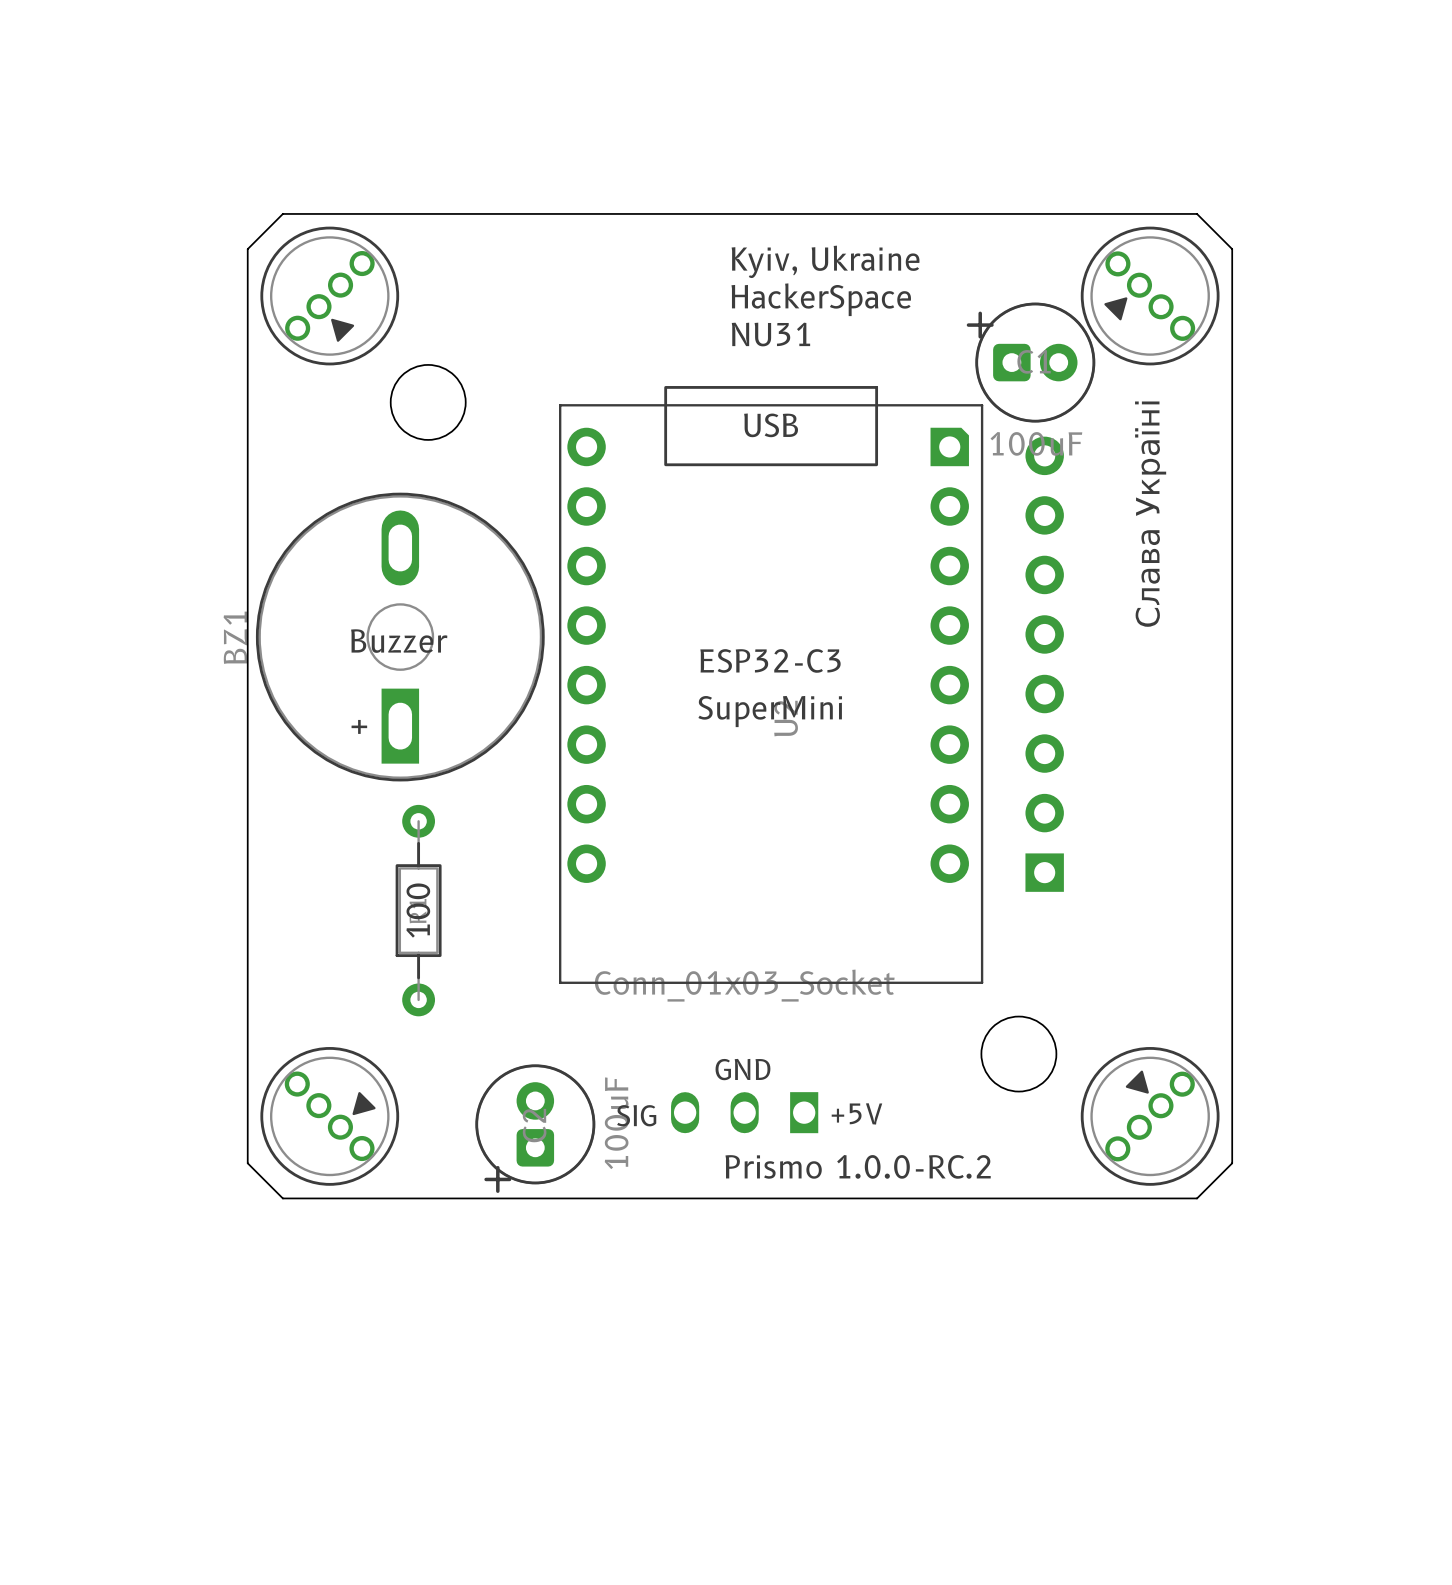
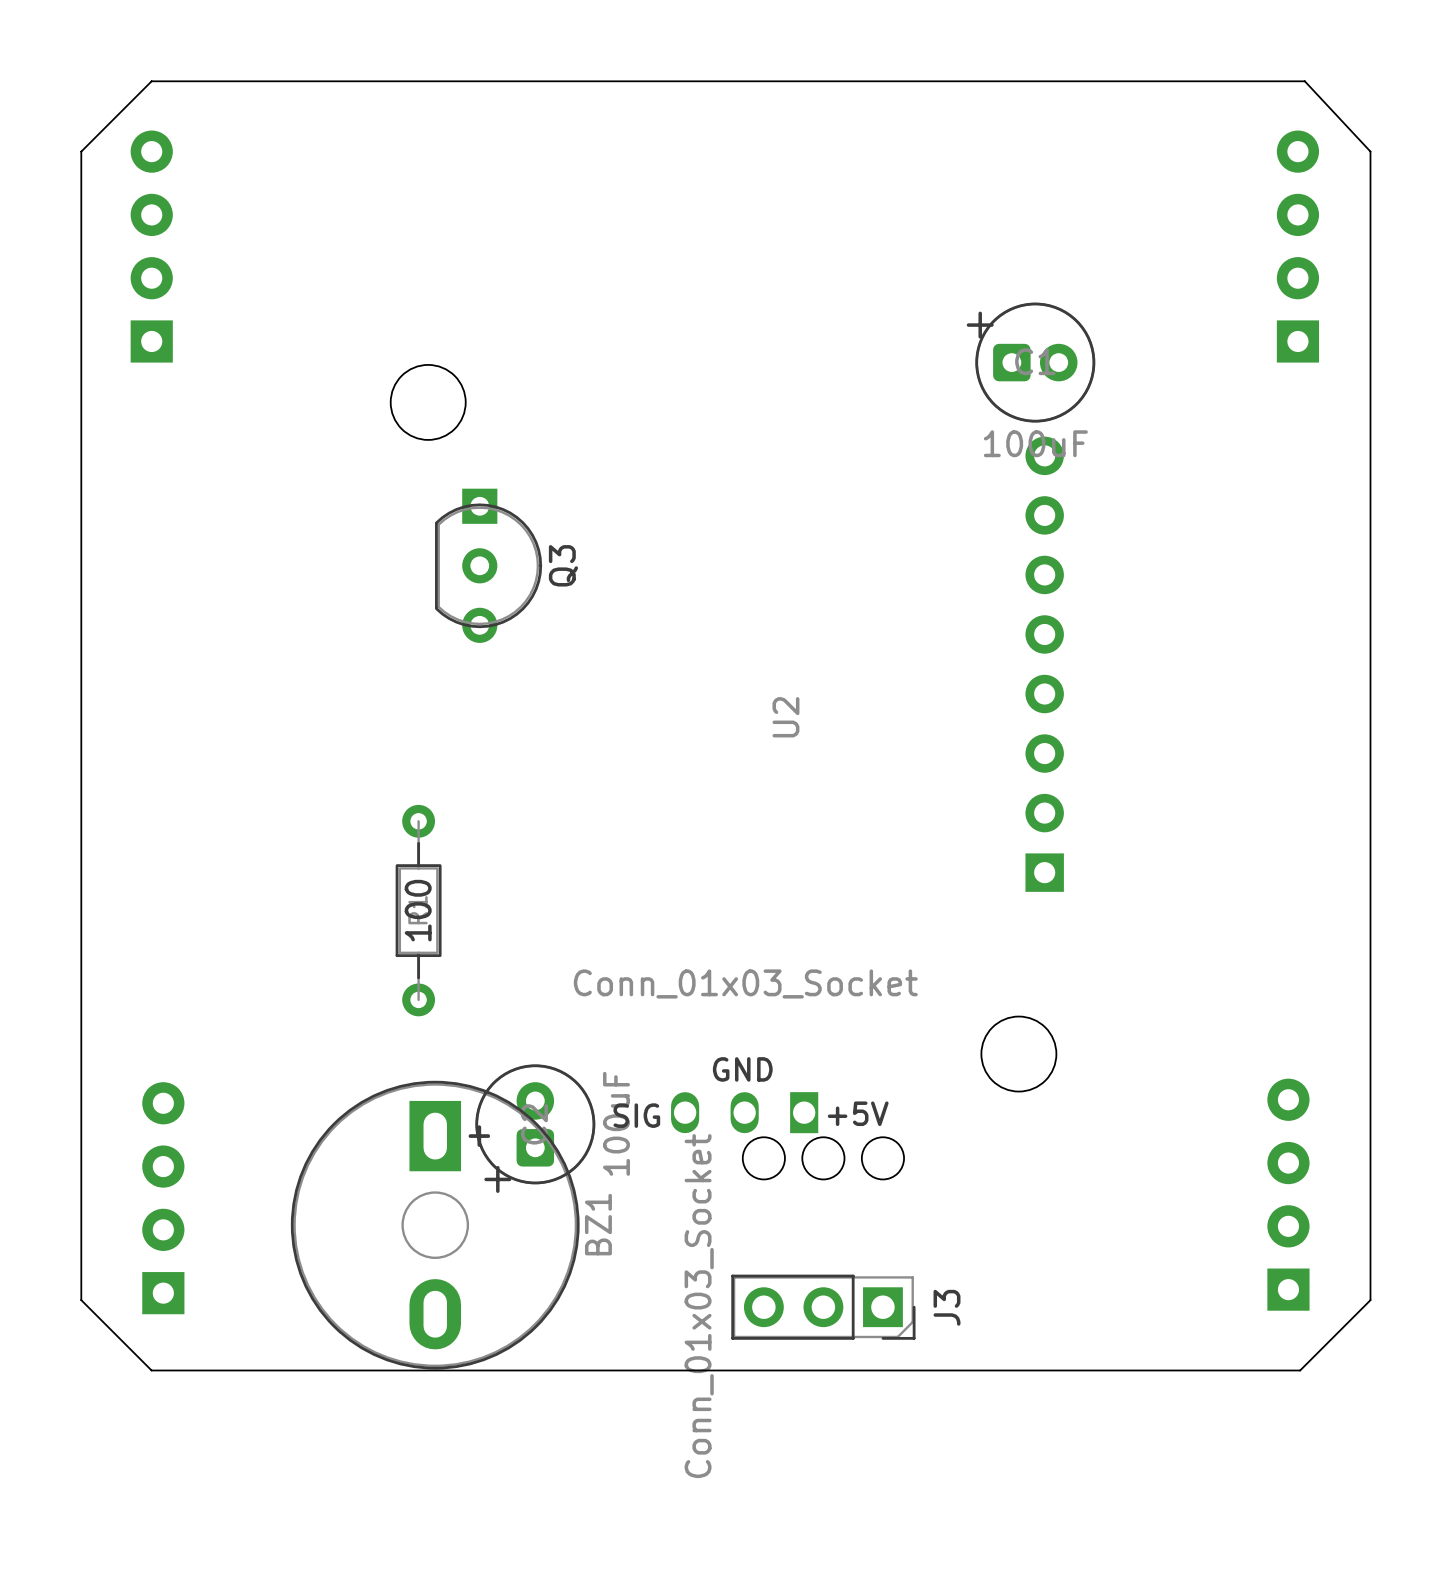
board edge: (282, 213) (247, 249) (247, 1163) (282, 1198) (1197, 1198) (1232, 1163) (1232, 249) (1197, 213) (282, 213) -> (151, 81) (81, 151) (81, 1300) (151, 1370) (1300, 1370) (1370, 1300) (1370, 151) (1304, 81) (151, 81)
part: none -> (151, 246)
part: none -> (1297, 246)
text: Kyiv, Ukraine (825, 261) -> none
part: (329, 296) -> none
part: (1150, 296) -> none
text: HackerSpace (821, 299) -> none
text: NU31 (770, 334) -> none
BZ1 footprint: [255, 492, 545, 782] -> [290, 1080, 580, 1370]
text: Слава Україні (1150, 514) -> none
Q3: none -> (488, 565)
BZ1 name position: BZ1 (235, 637) -> BZ1 (598, 1224)
BZ1 value: Buzzer (399, 641) -> none
part: (771, 684) -> none
part: (329, 1116) -> none
part: (1150, 1116) -> none
text: Prismo 1.0.0-RC.2 (858, 1166) -> none
part: none -> (1288, 1194)
part: none -> (163, 1198)
J3: none -> Conn_01x03_Socket (823, 1238)

